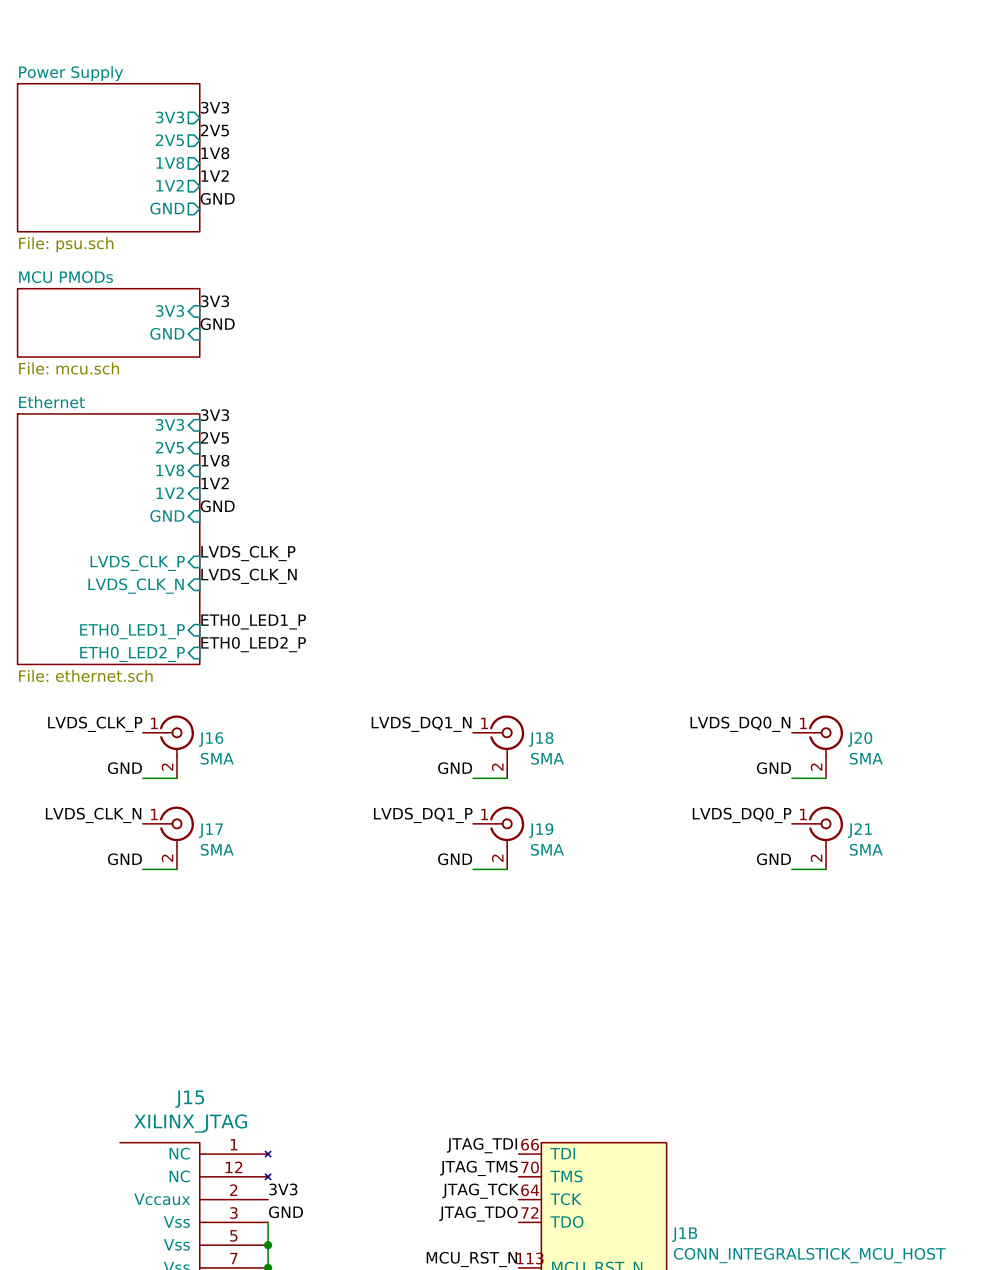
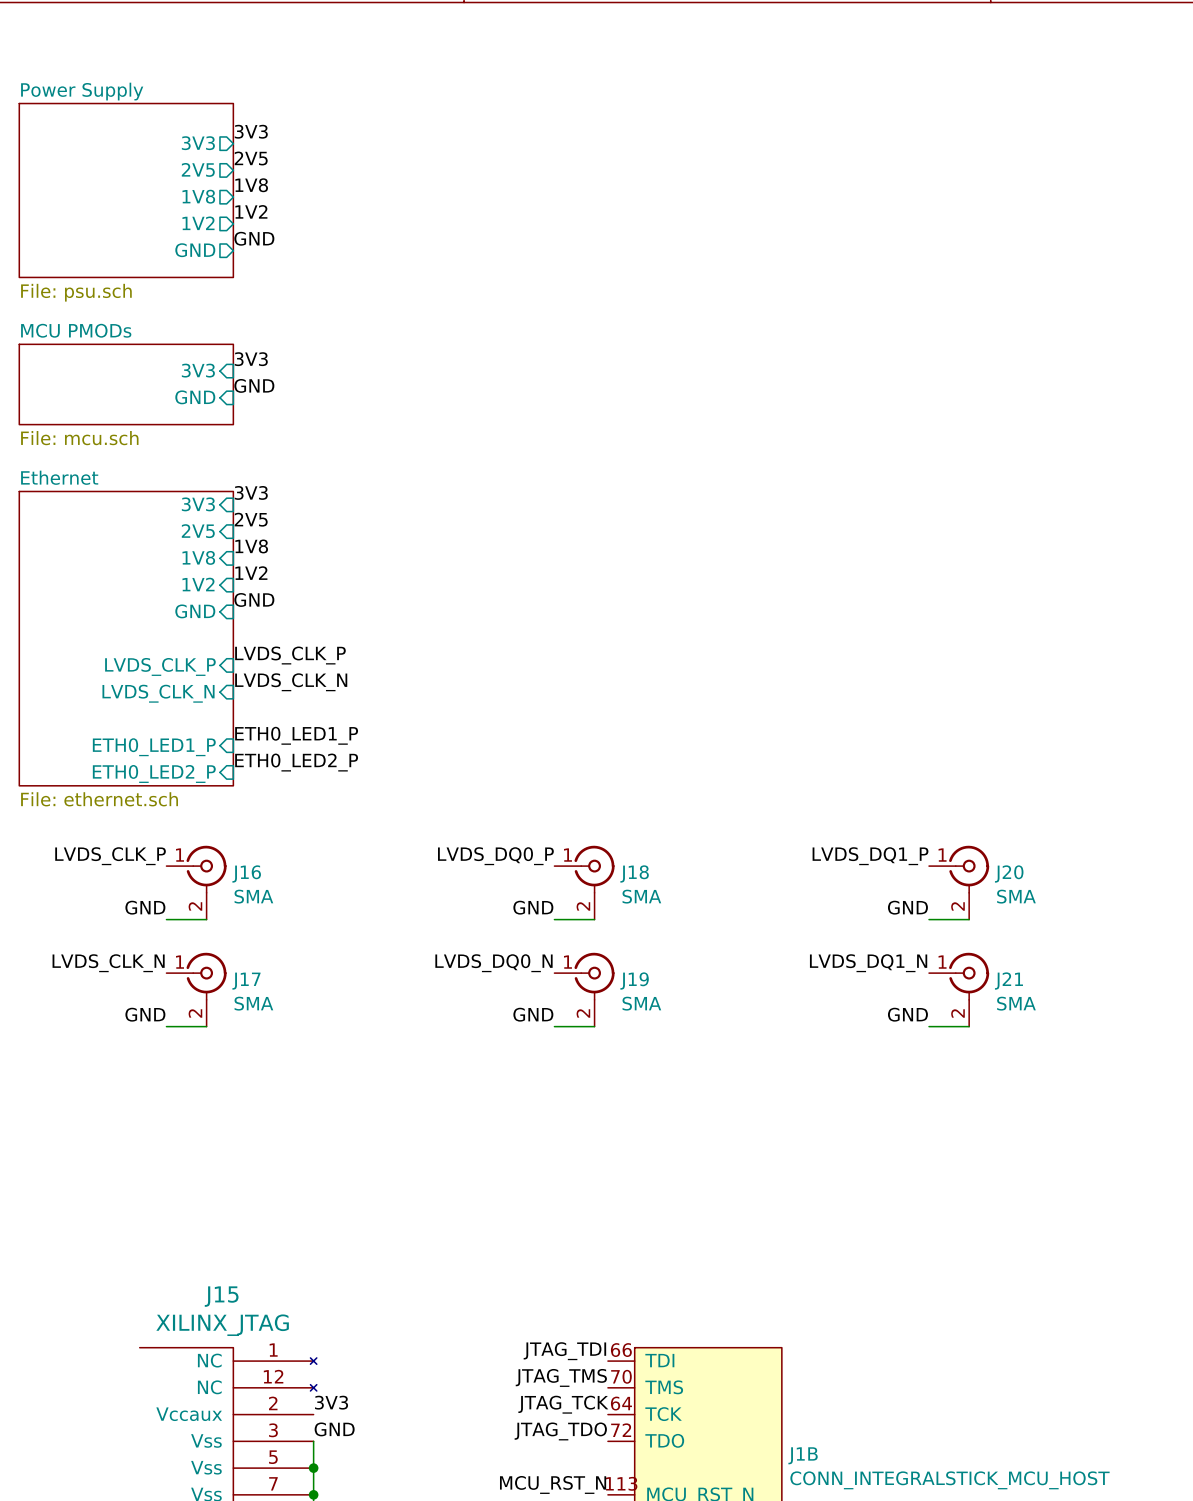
label: LVDS_DQ1_N (421, 724) -> LVDS_DQ0_P (495, 856)
label: LVDS_DQ0_N (740, 724) -> LVDS_DQ1_P (870, 856)
label: LVDS_DQ1_P (423, 815) -> LVDS_DQ0_N (493, 963)
label: LVDS_DQ0_P (742, 815) -> LVDS_DQ1_N (868, 963)

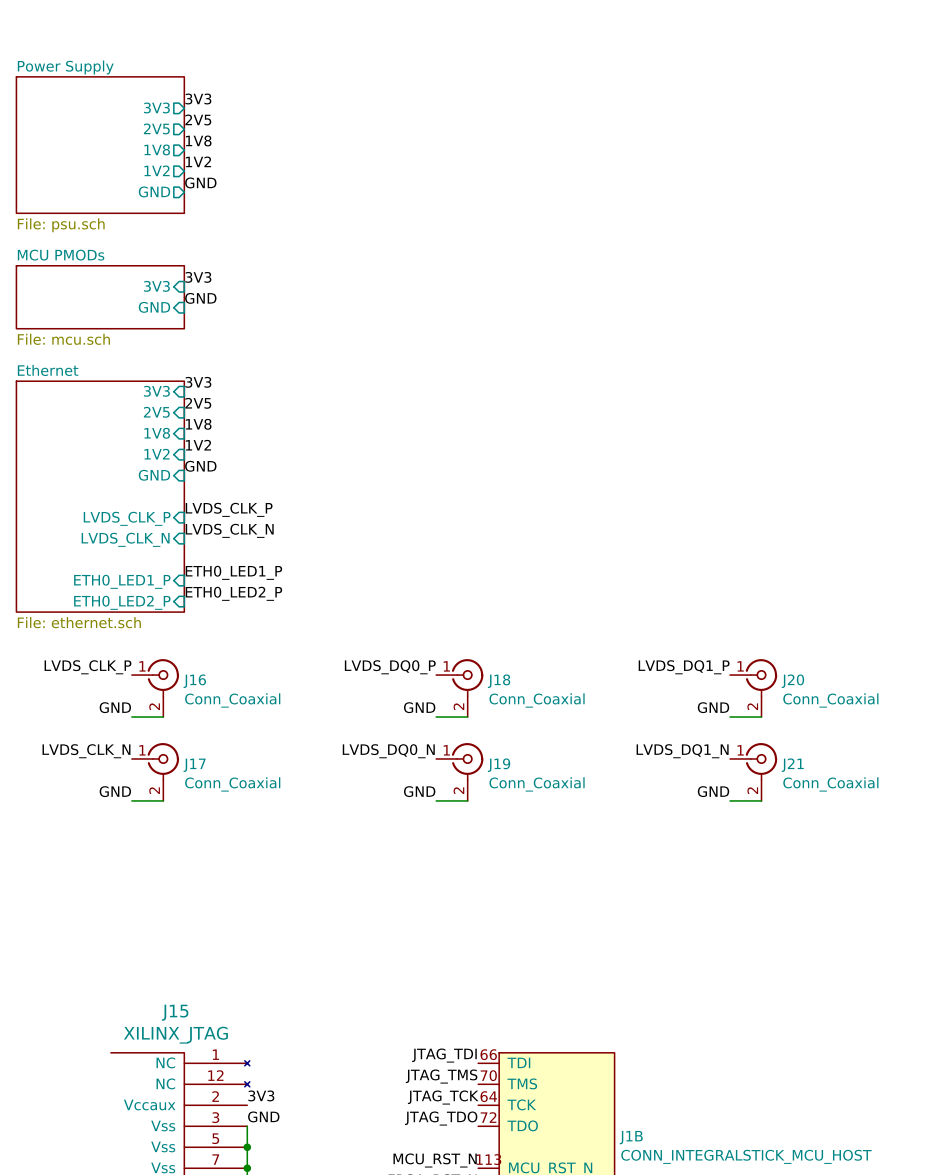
J16 value: SMA (253, 896) -> Conn_Coaxial (232, 700)
J18 value: SMA (641, 896) -> Conn_Coaxial (537, 700)
J20 value: SMA (1016, 896) -> Conn_Coaxial (830, 700)
J17 value: SMA (253, 1003) -> Conn_Coaxial (232, 784)
J19 value: SMA (641, 1003) -> Conn_Coaxial (537, 784)
J21 value: SMA (1016, 1003) -> Conn_Coaxial (830, 784)

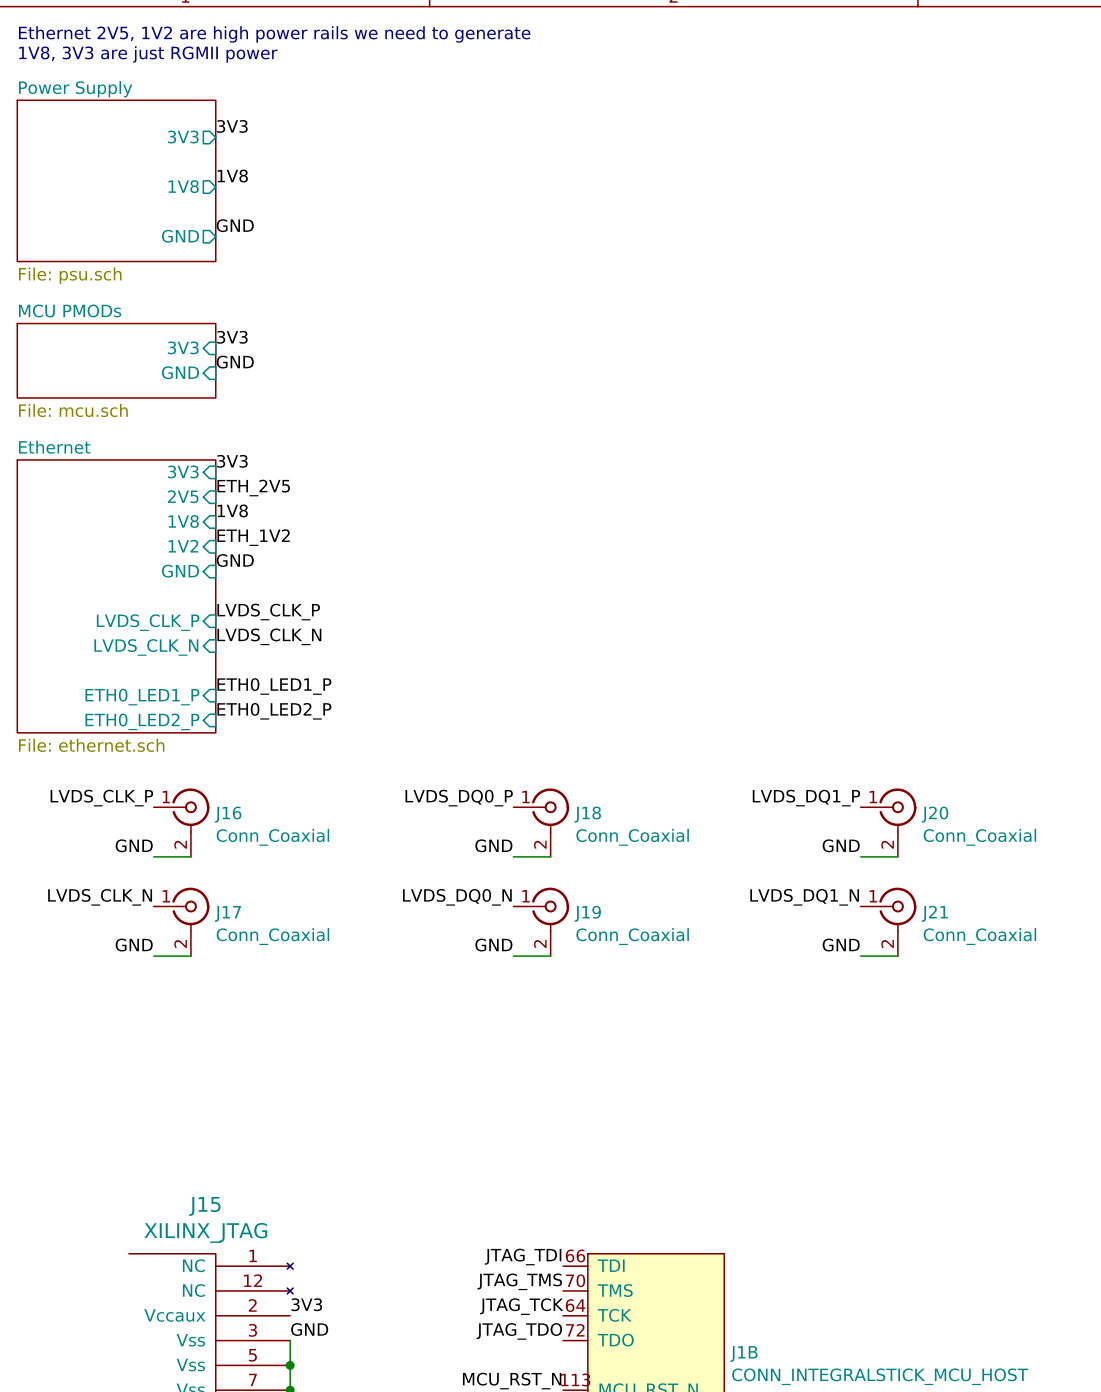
text: none -> Ethernet 2V5, 1V2 are high power rails we need to generate (274, 34)
text: none -> 1V8, 3V3 are just RGMII power (148, 54)
label: 2V5 (198, 119) -> none
sheet pin: 2V5 (156, 128) -> none
label: 1V2 (198, 161) -> none
sheet pin: 1V2 (156, 170) -> none
label: 2V5 (198, 403) -> ETH_2V5 (253, 488)
label: 1V2 (198, 445) -> ETH_1V2 (253, 537)

